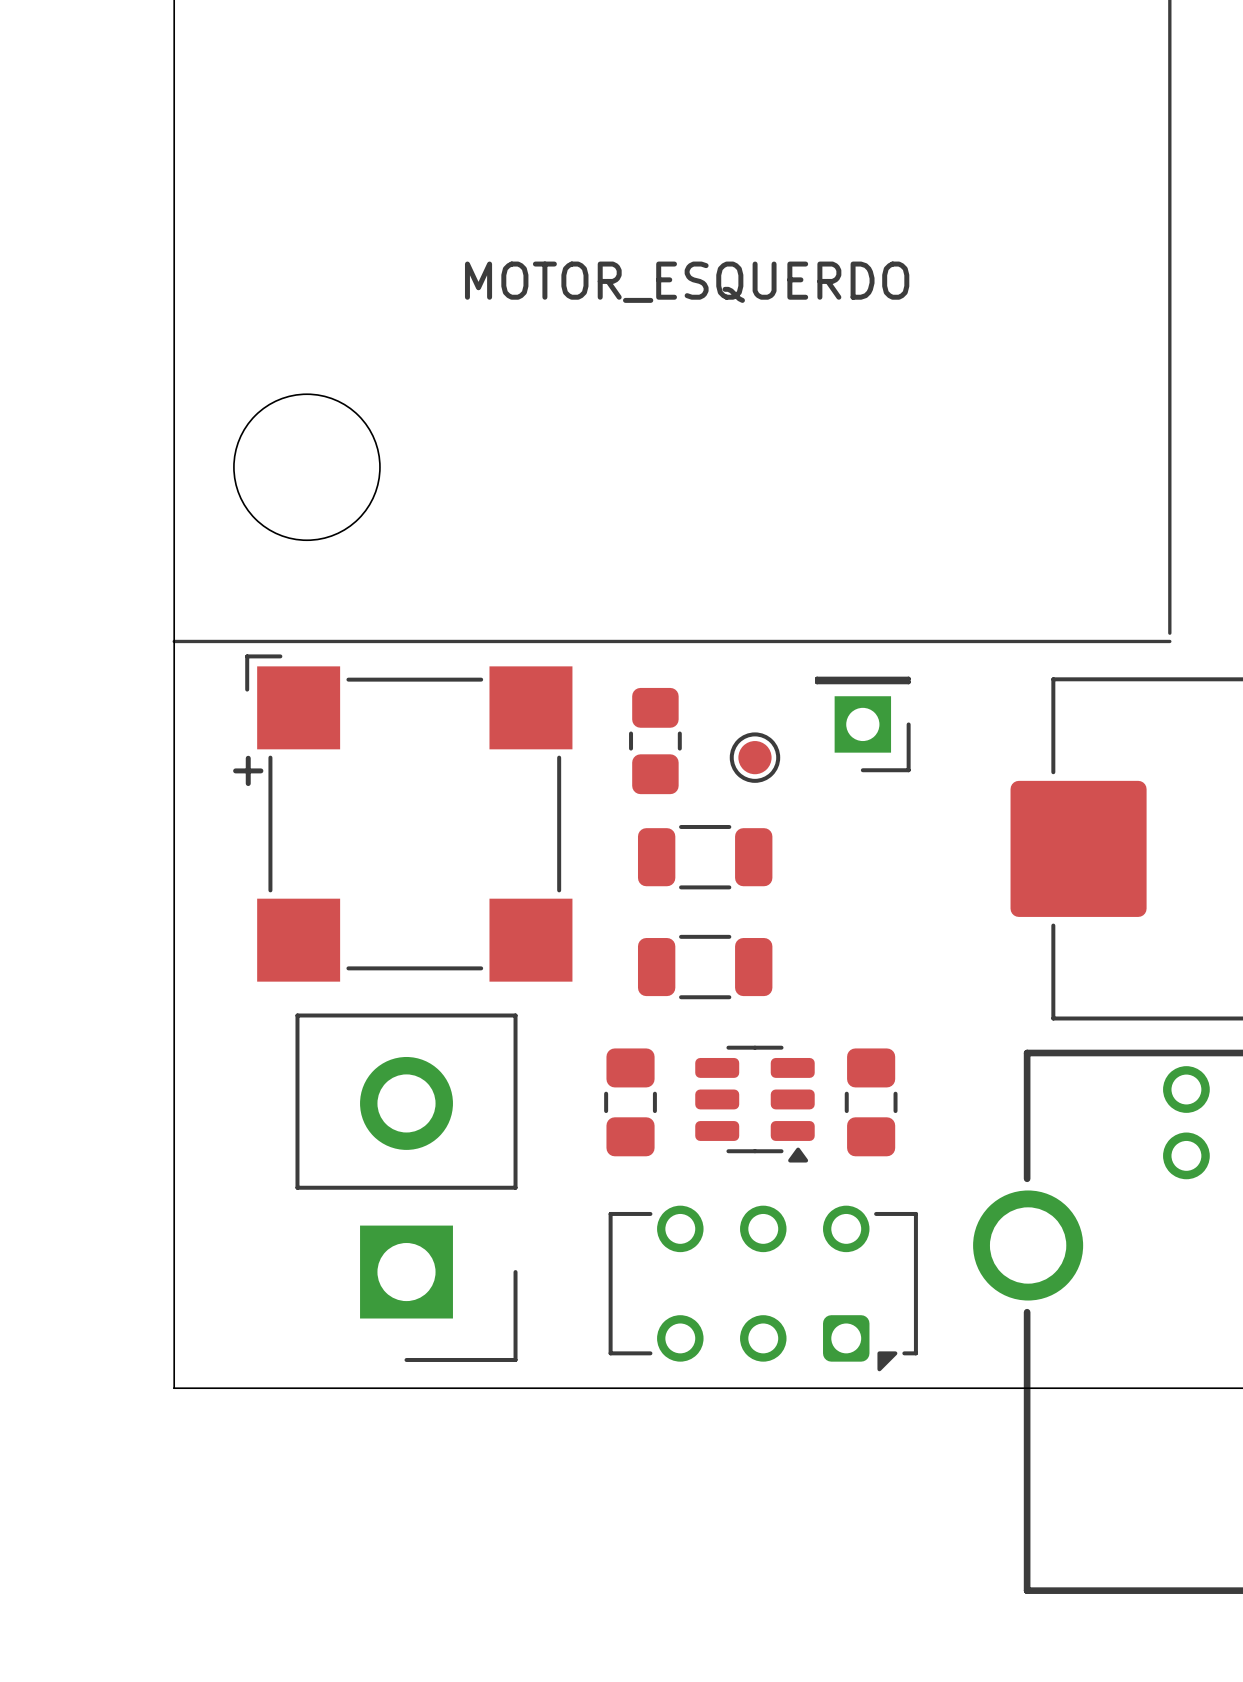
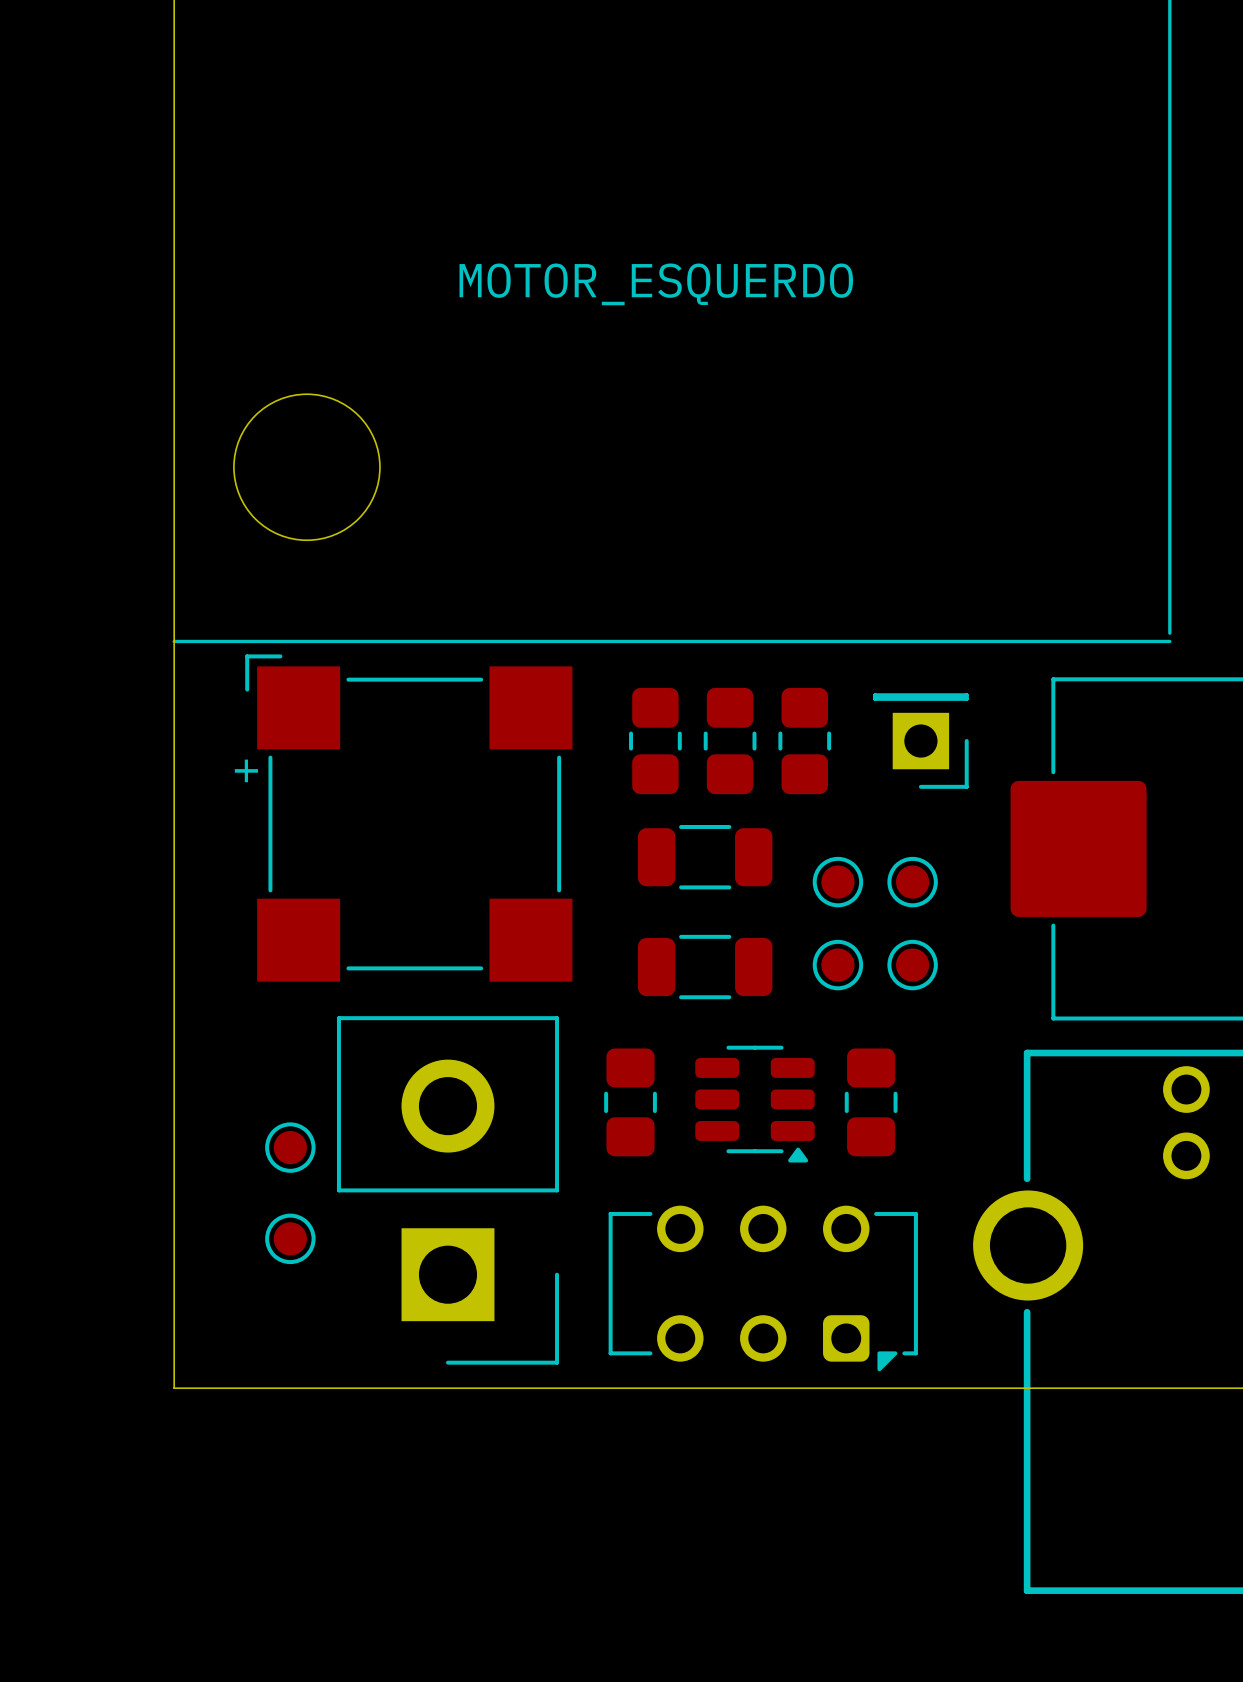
part position: (862, 724) -> (920, 741)
part: none -> (730, 741)
part: none -> (804, 741)
part: (754, 757) -> none
part: none -> (837, 882)
part: none -> (912, 882)
part: none -> (837, 965)
part: none -> (912, 965)
part: none -> (290, 1147)
part position: (406, 1187) -> (447, 1190)
part: none -> (290, 1238)

